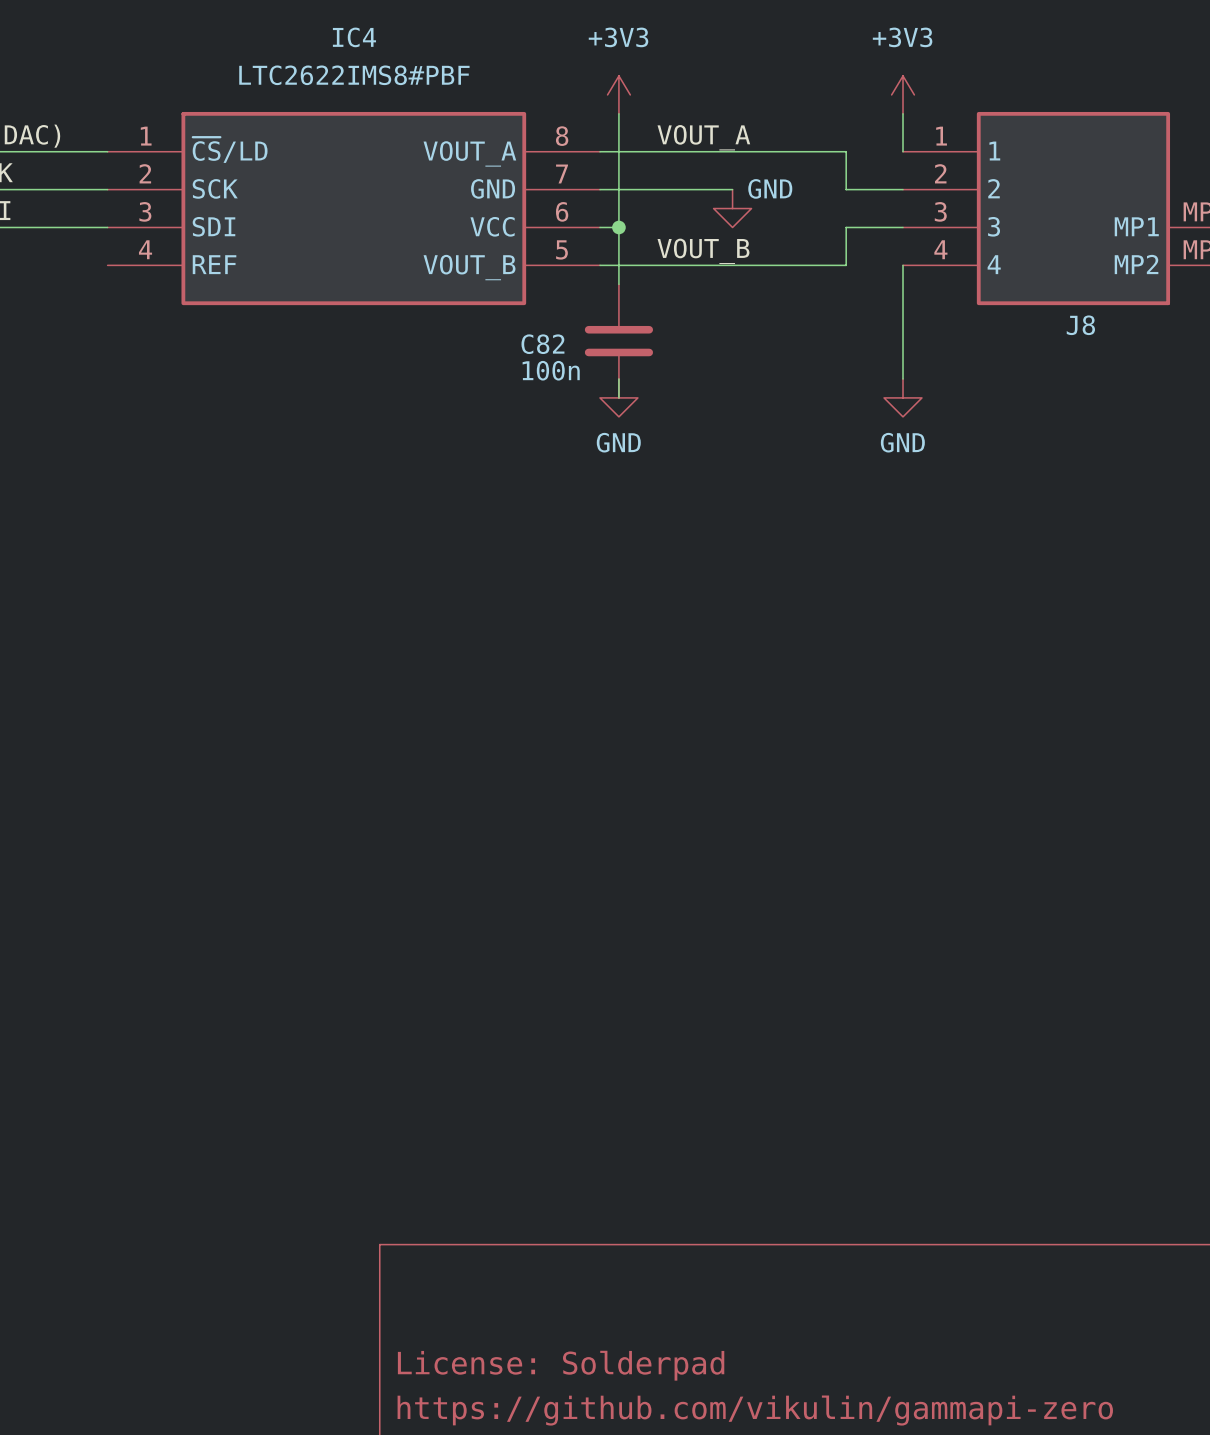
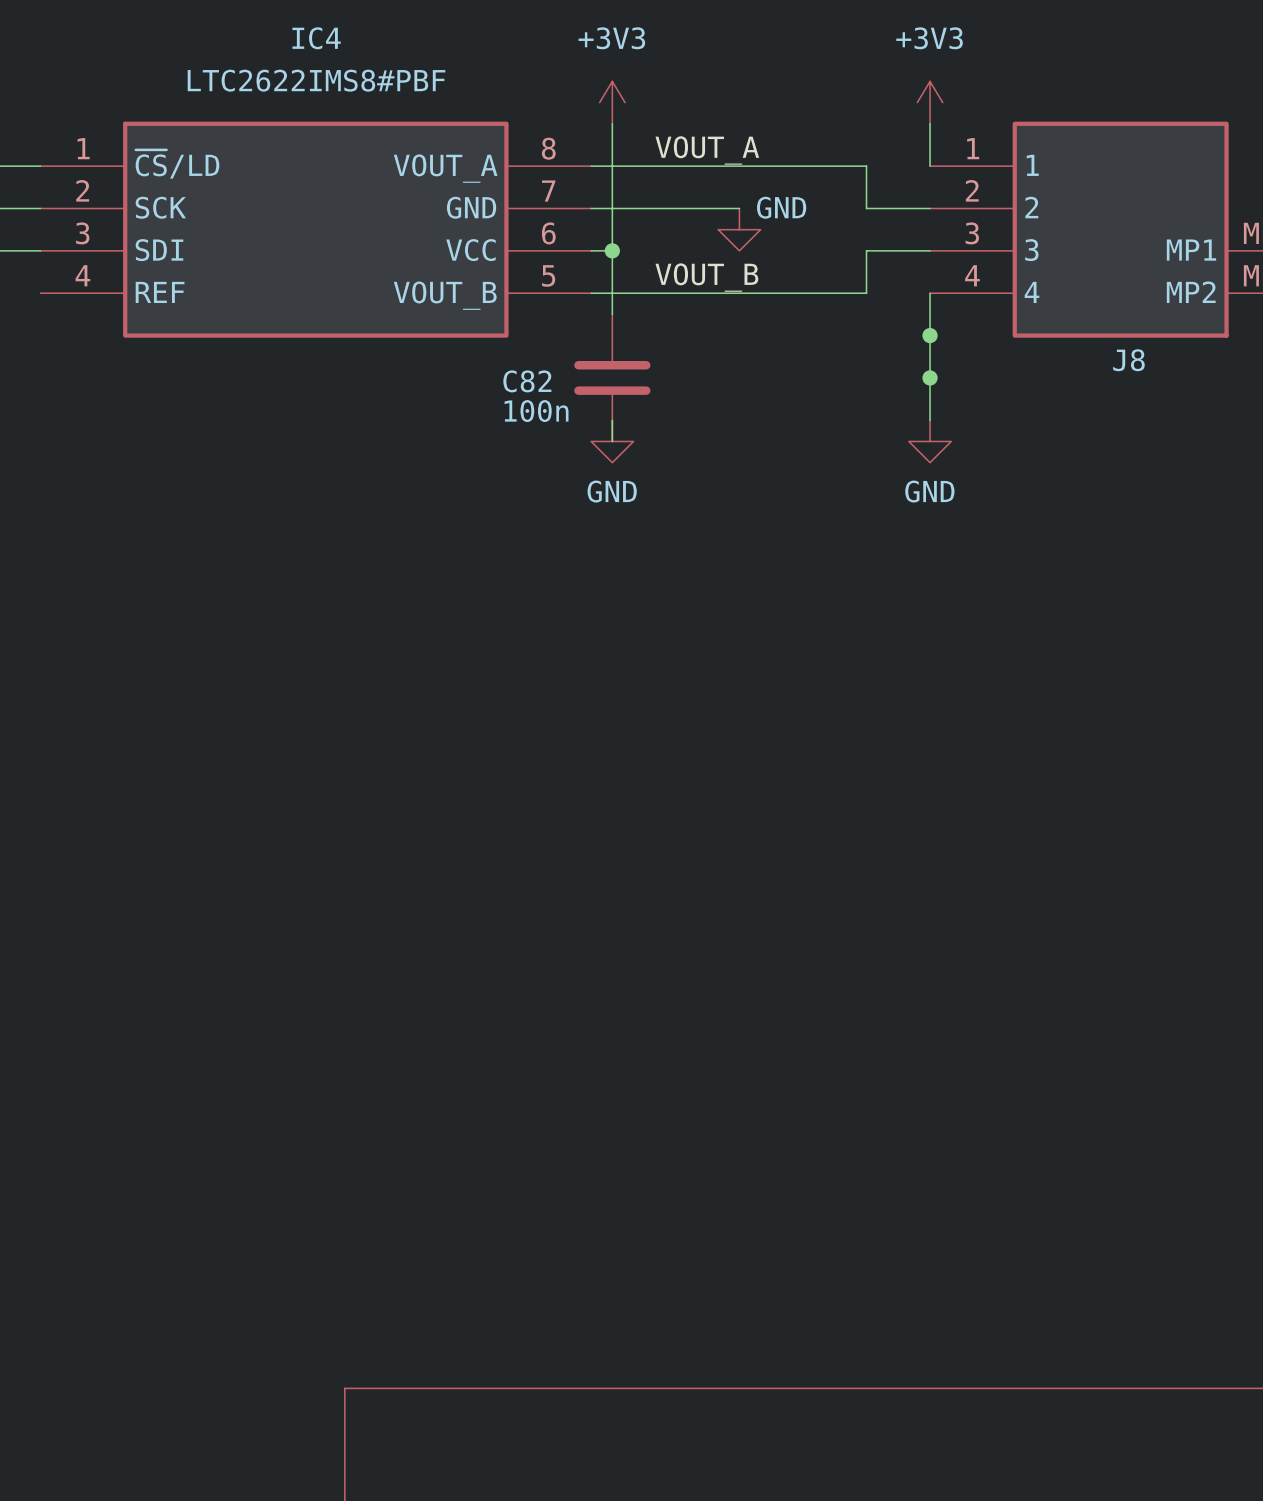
junction: none -> (930, 335)
junction: none -> (930, 377)

